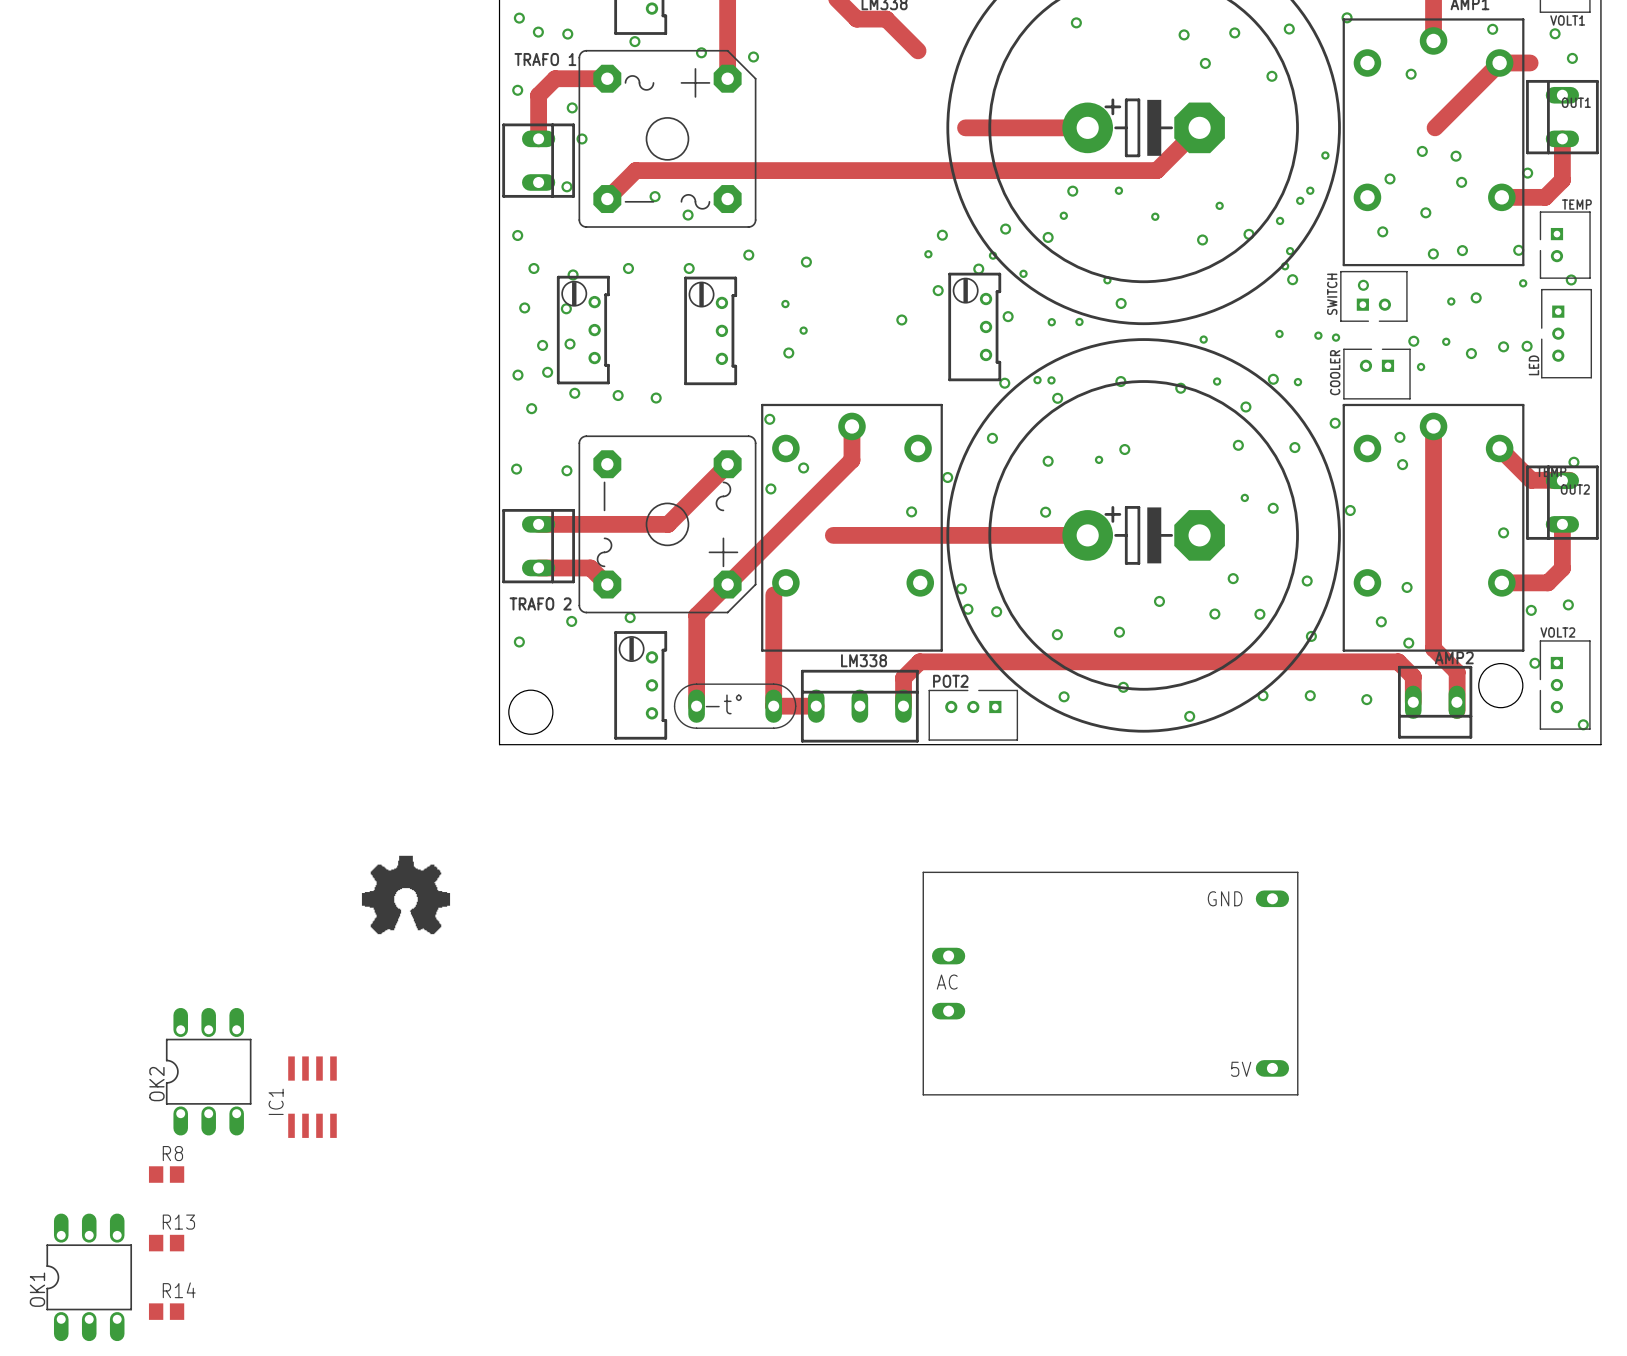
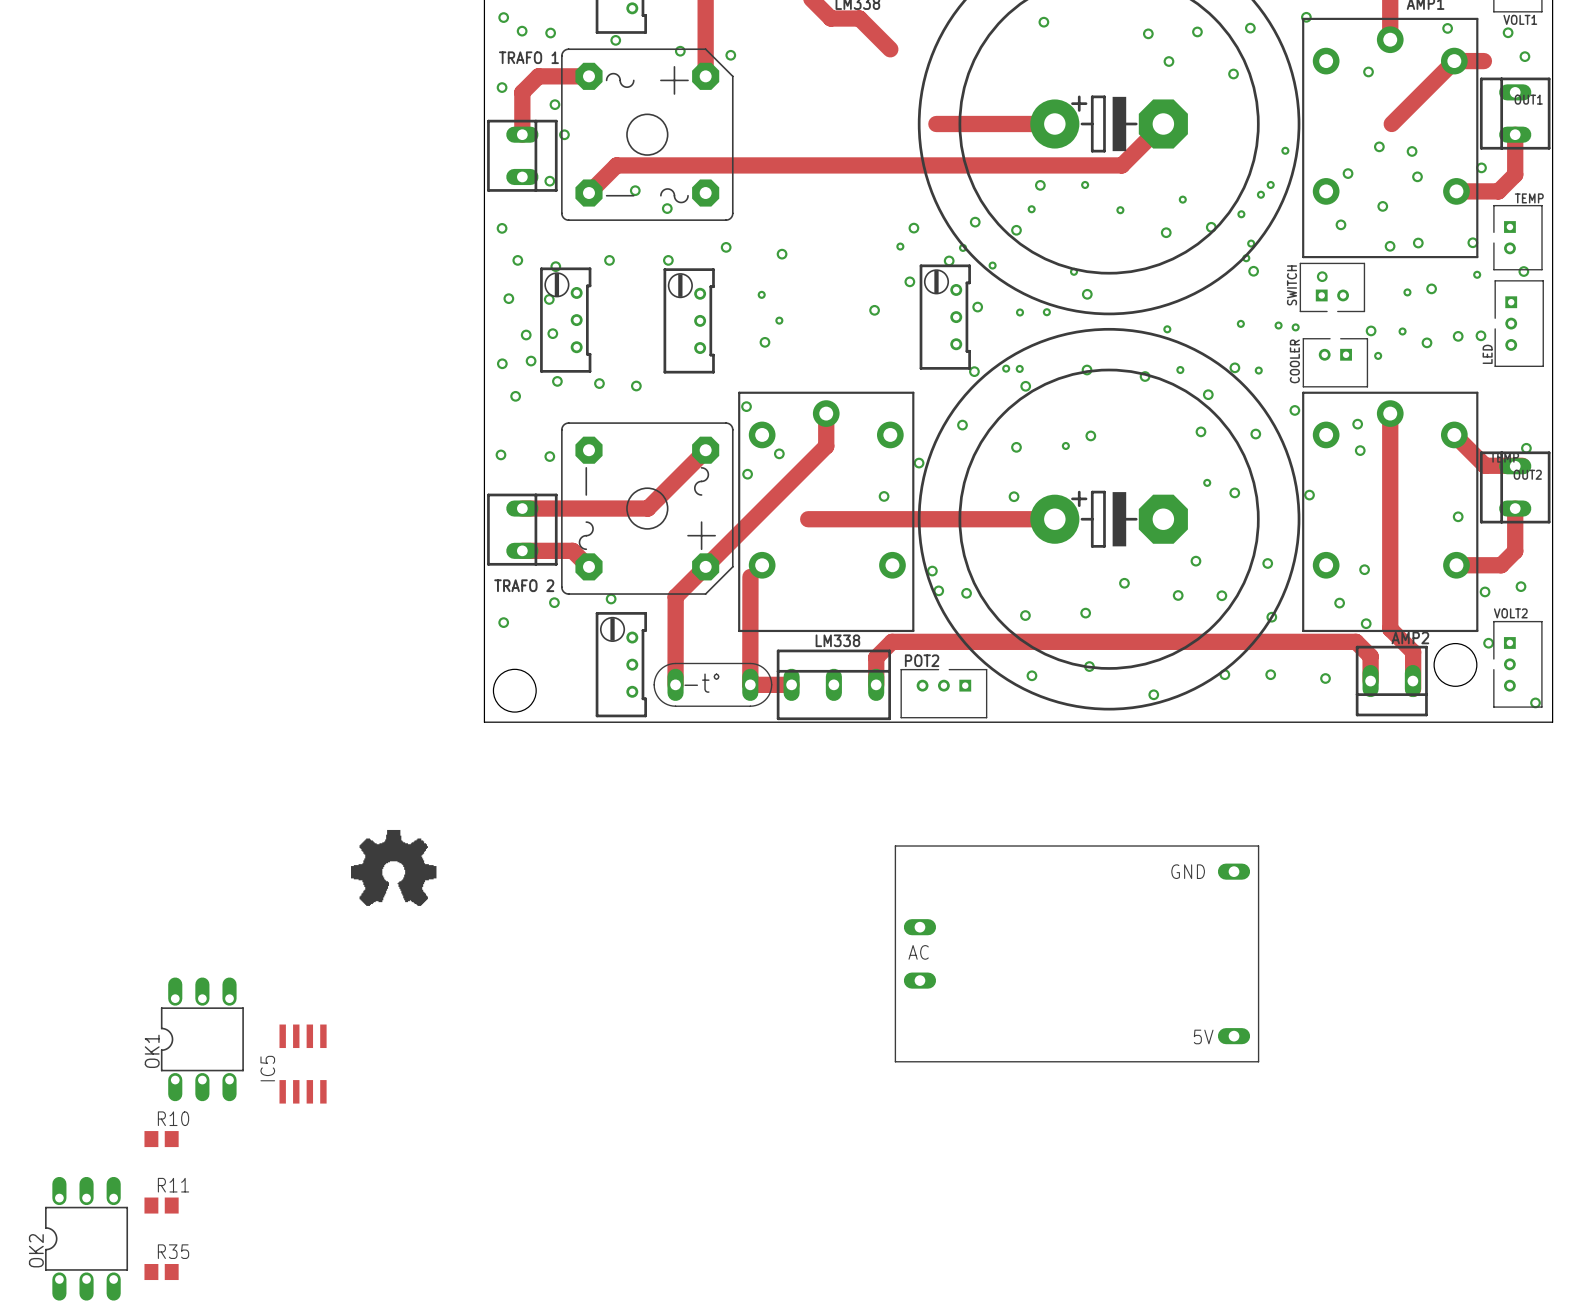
OK2 name: OK2 (156, 1084) -> OK1 (152, 1051)
IC1 name: IC1 (276, 1101) -> IC5 (267, 1068)
R8 name: R8 (172, 1153) -> R10 (173, 1118)
R13 name: R13 (178, 1222) -> R11 (173, 1185)
OK1 name: OK1 (37, 1289) -> OK2 (36, 1250)
R14 name: R14 (179, 1290) -> R35 (173, 1251)

